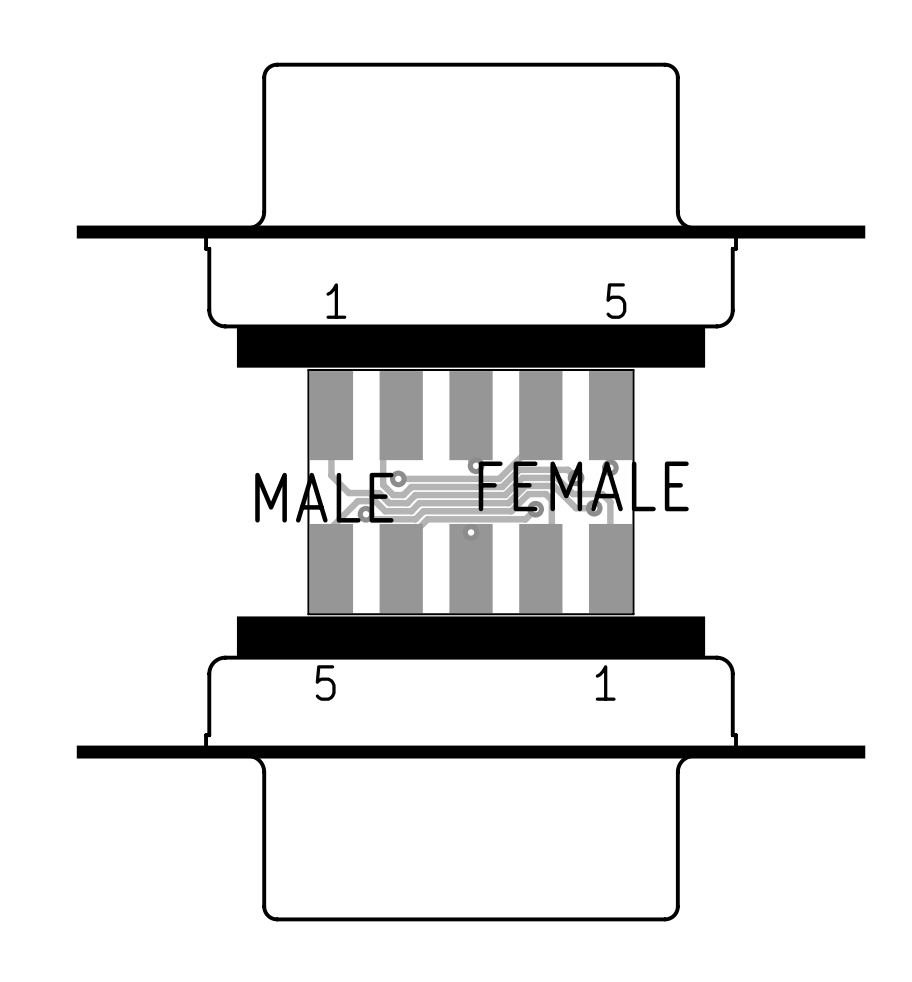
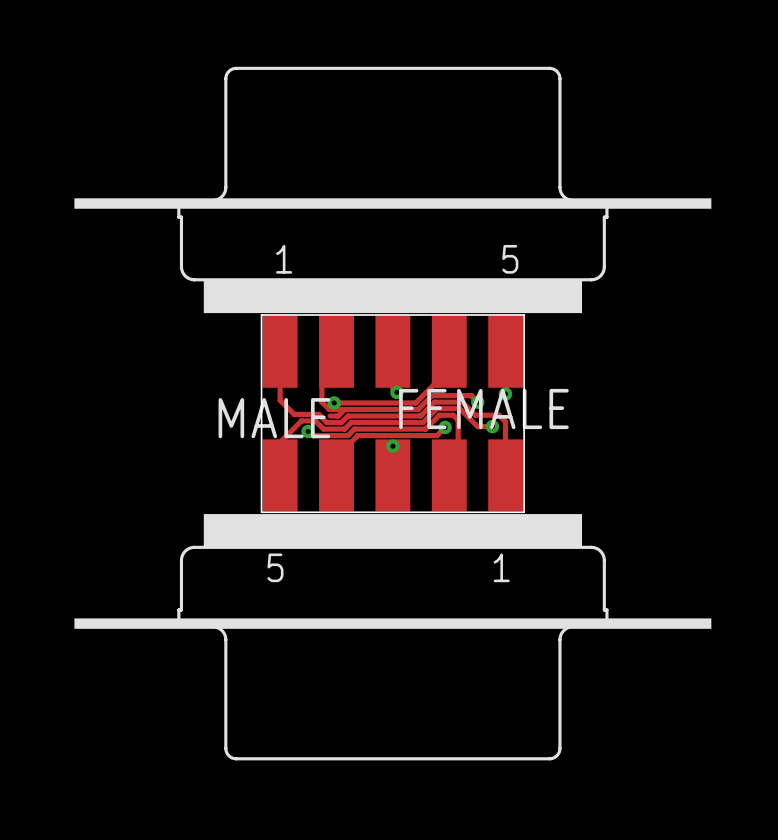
track: (383, 477) (383, 484) (393, 495) -> (321, 402) (329, 409) (344, 409)

